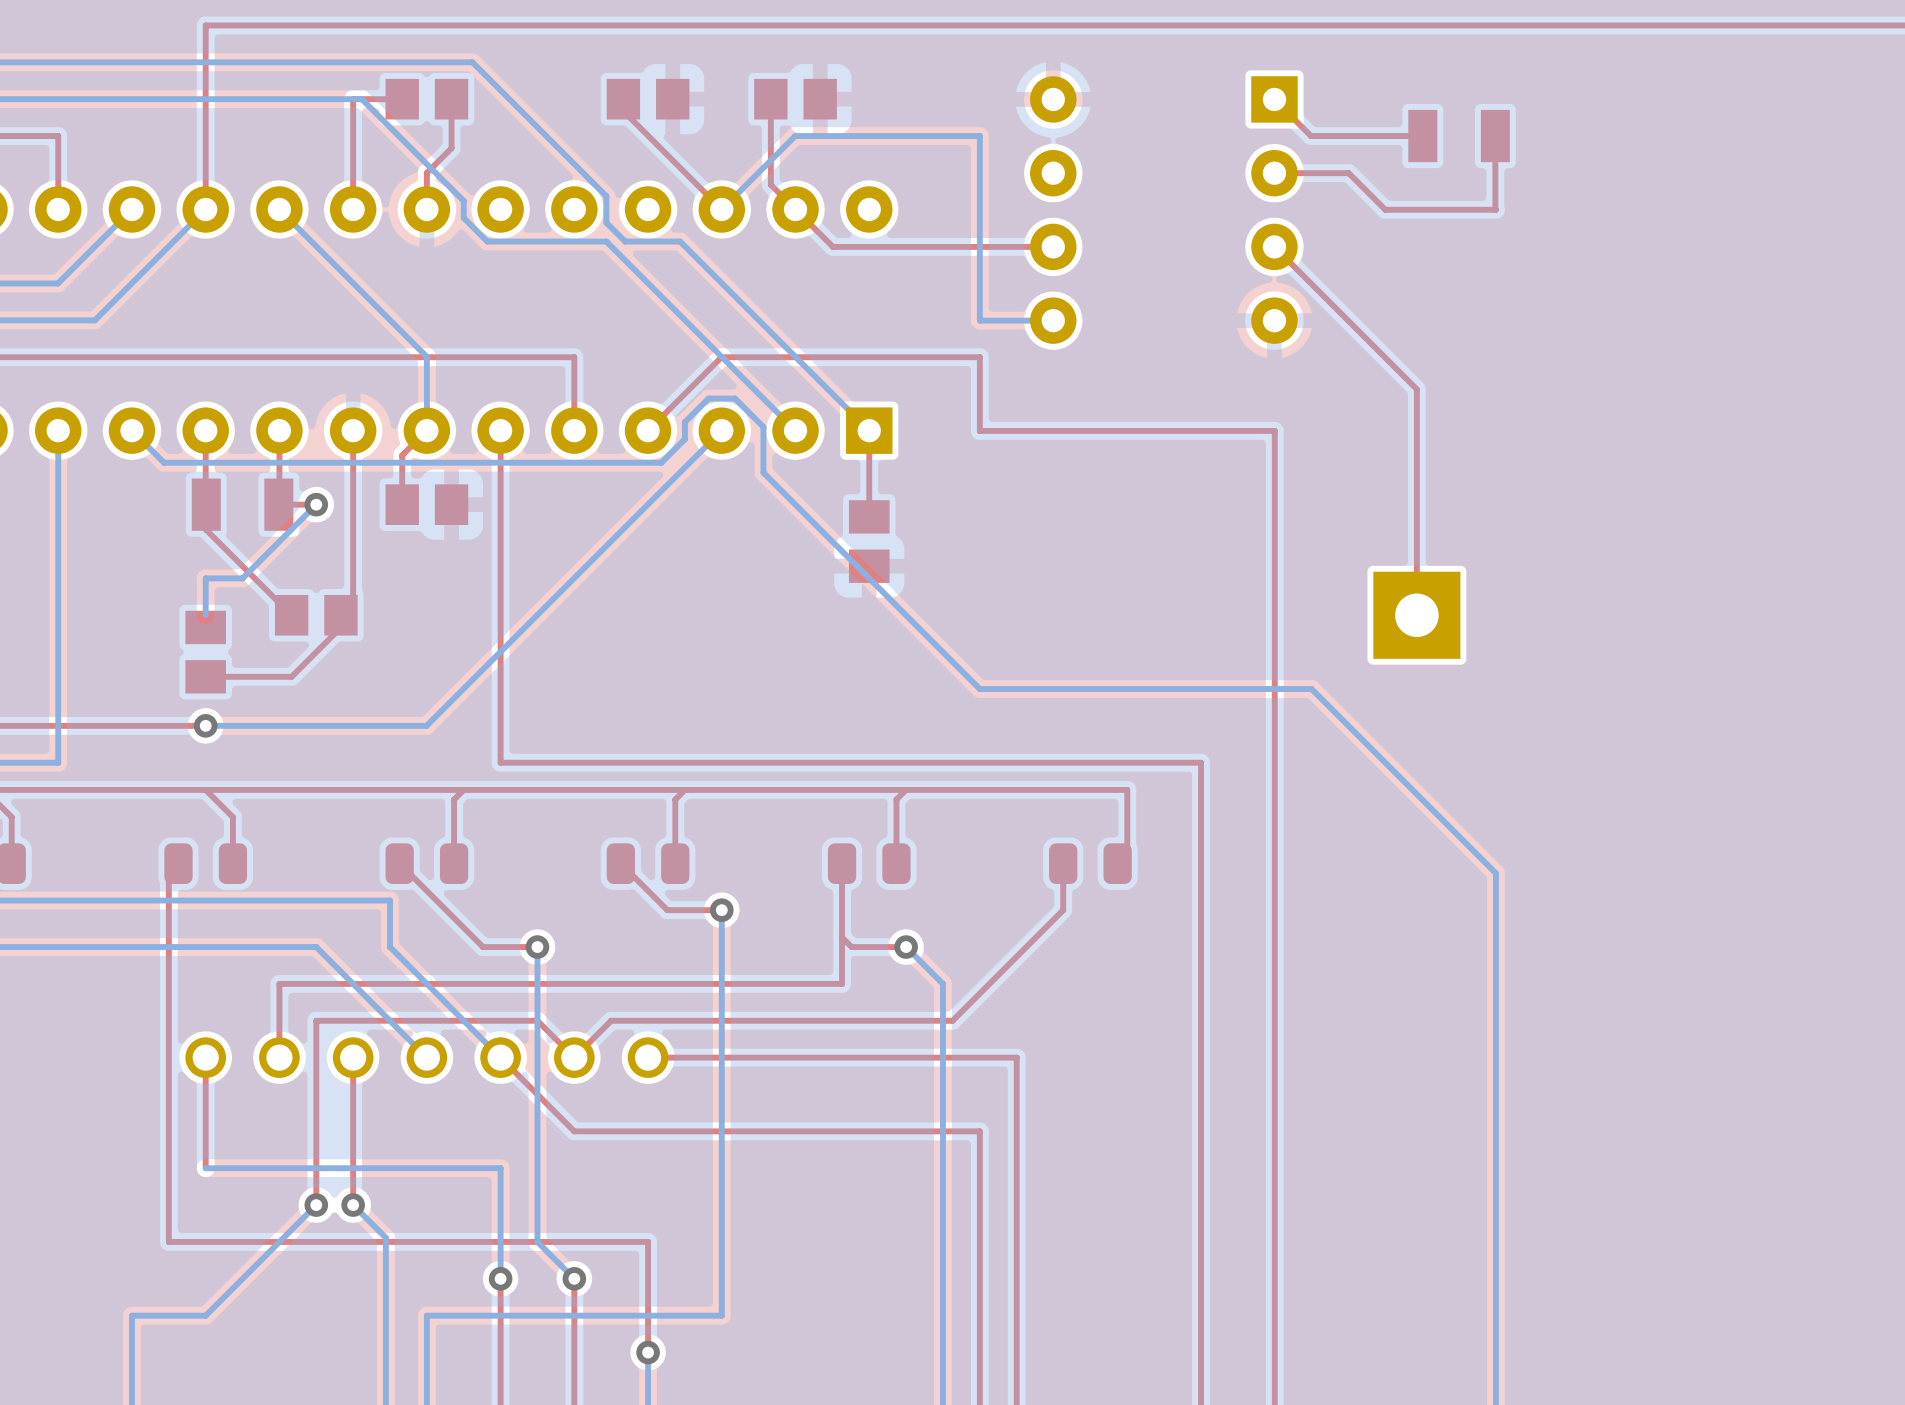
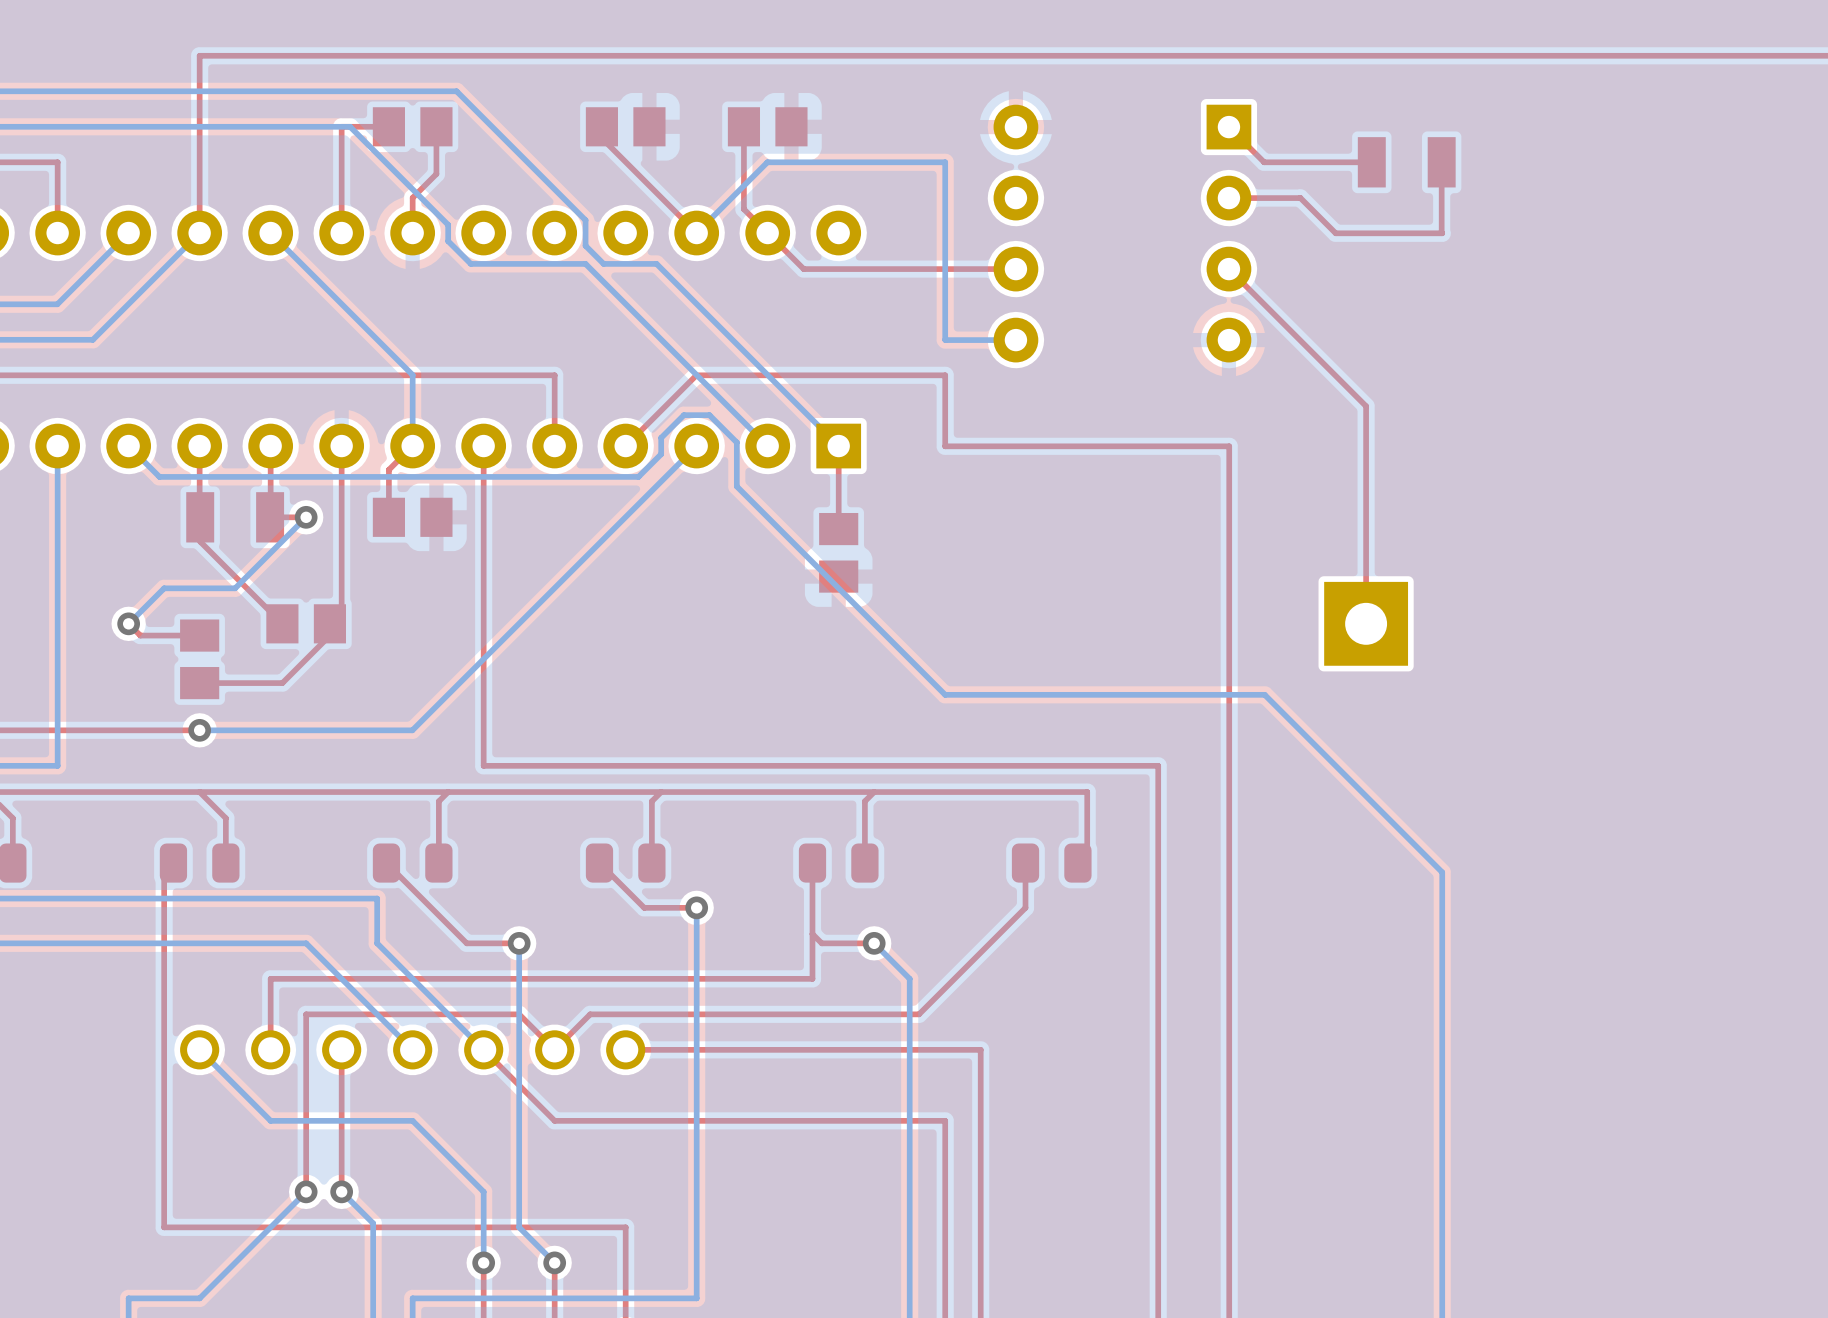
bottom track: (205, 578) (205, 615) -> (199, 588) (164, 588) (128, 623)
top track: none -> (128, 623) (140, 635) (199, 635)
via: none -> (128, 623)
top track: (205, 1057) (205, 1168) -> none
bottom track: (205, 1168) (500, 1168) (500, 1205) -> (199, 1049) (270, 1120) (412, 1120) (483, 1191)

